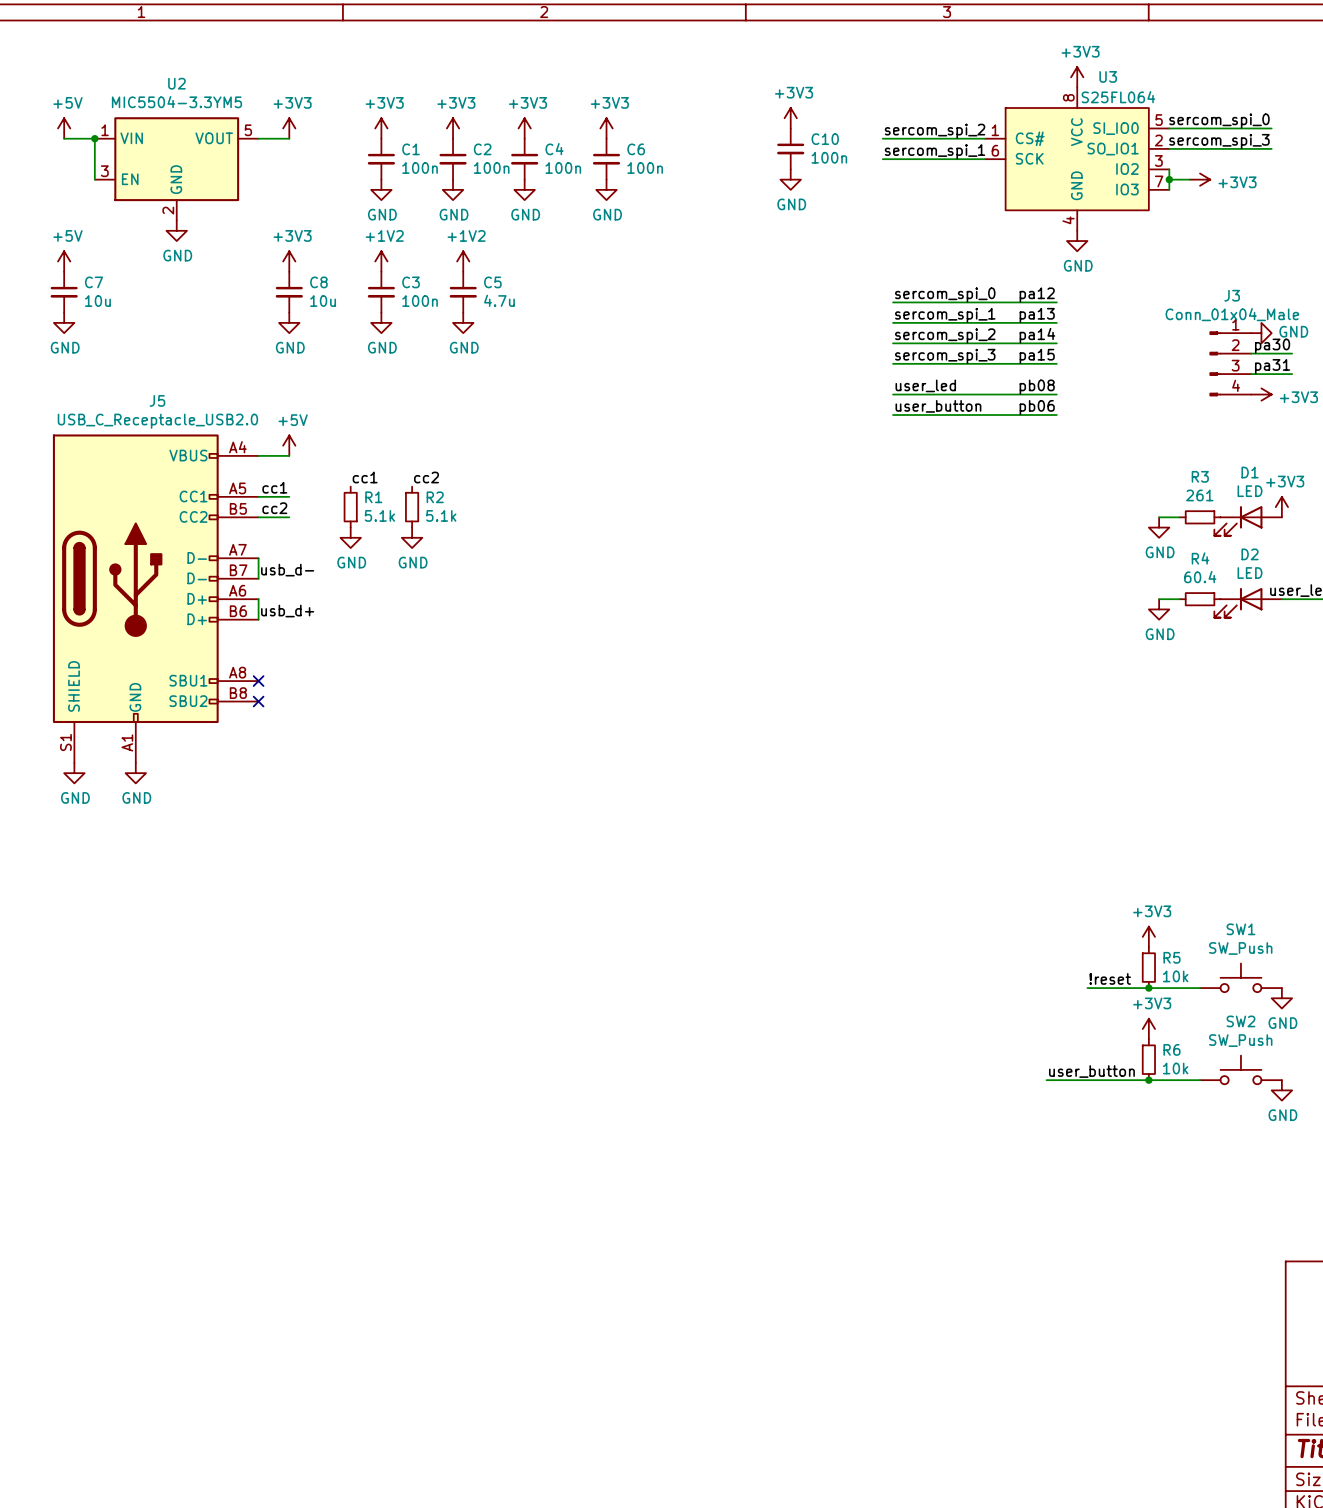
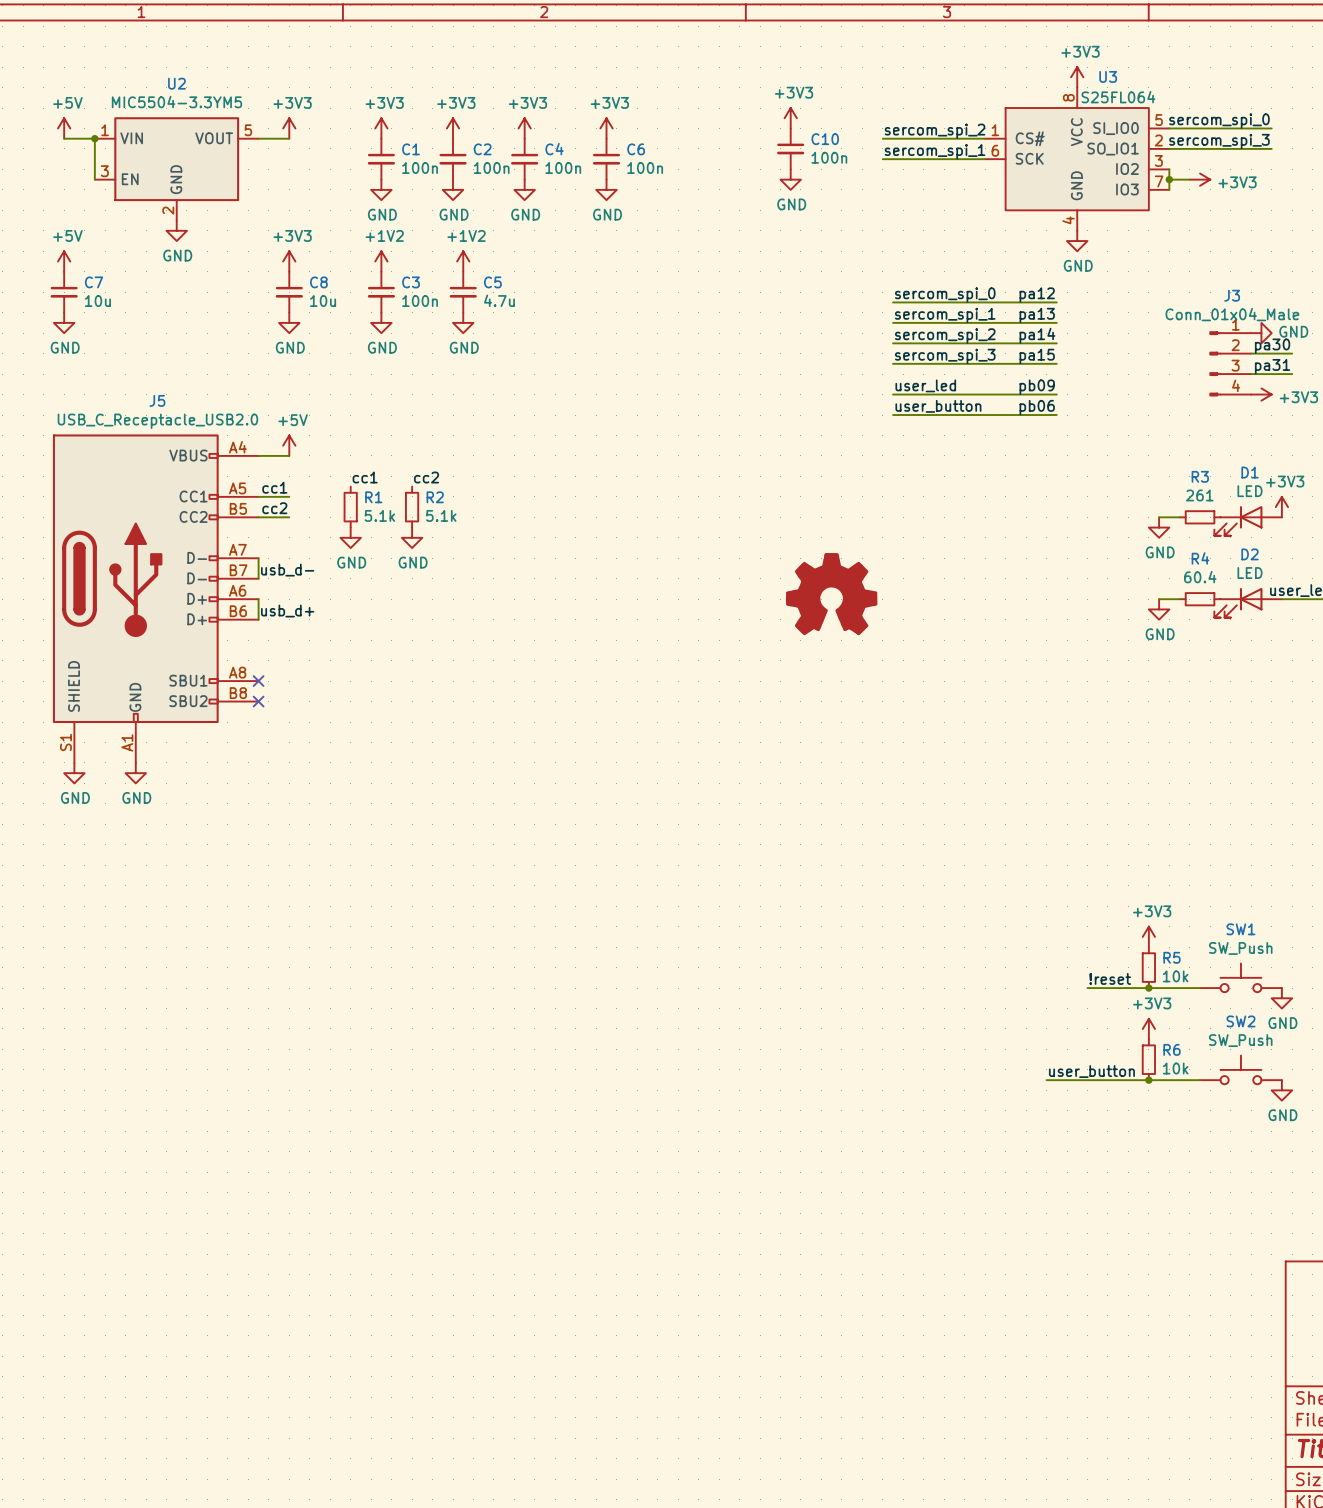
label: pb08 (1037, 387) -> pb09 (1037, 387)
power symbol: none -> (831, 594)

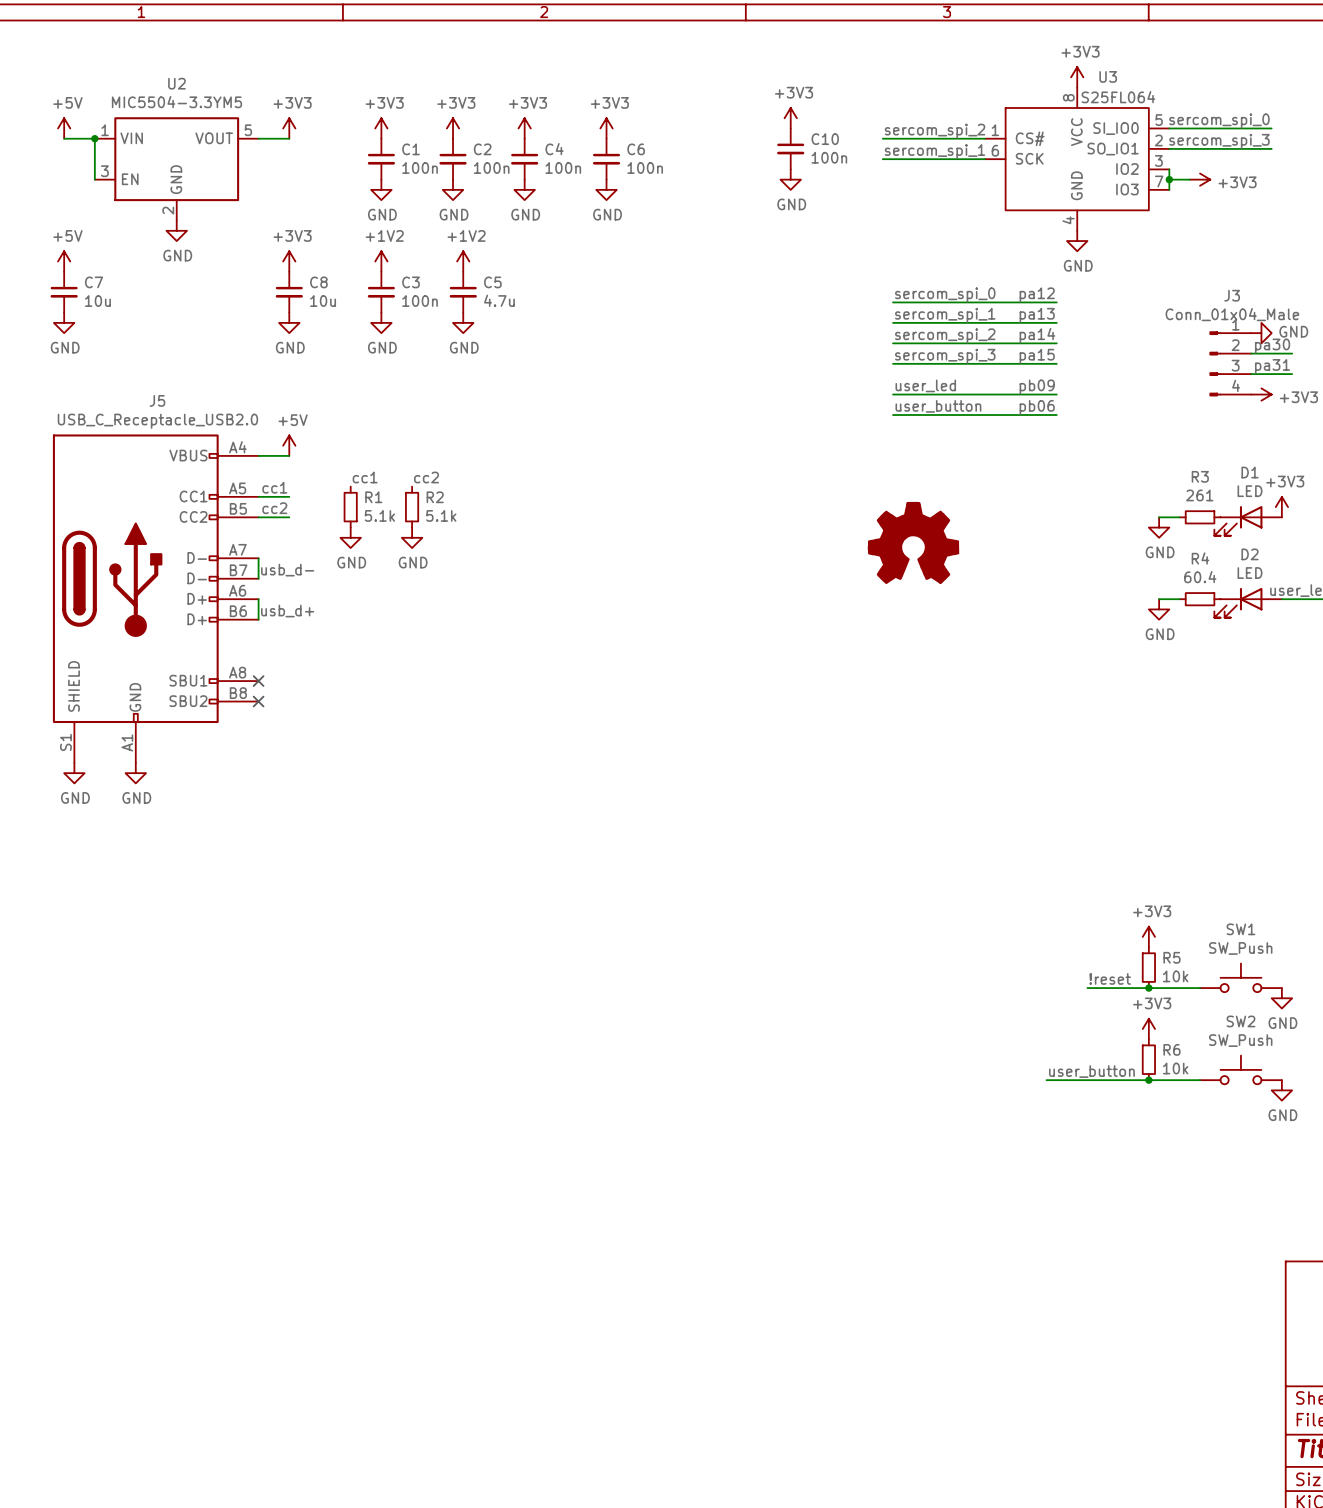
part: none -> (913, 542)
power symbol: (831, 594) -> none

